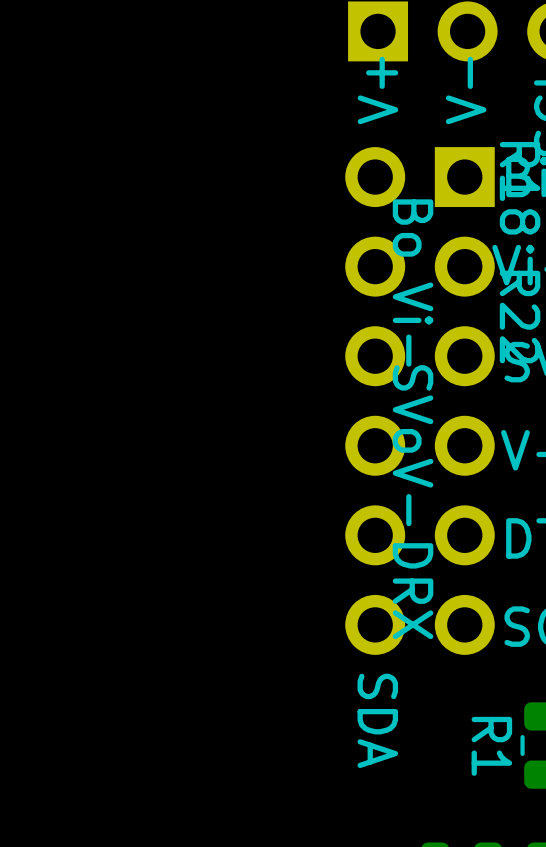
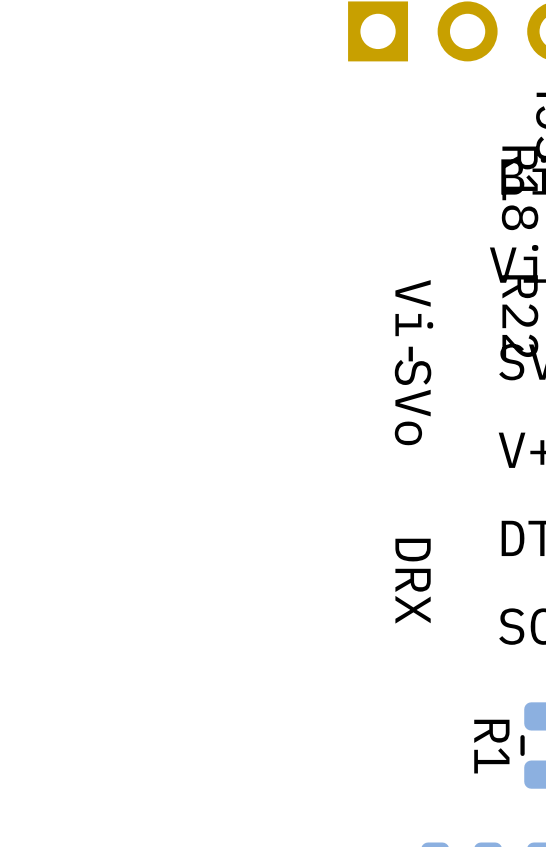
text: V+ (377, 90) -> none
text: V- (466, 90) -> none
text: Bo (413, 228) -> none
part: (420, 400) -> none
text: V- (413, 492) -> none
text: SDA (377, 720) -> none

